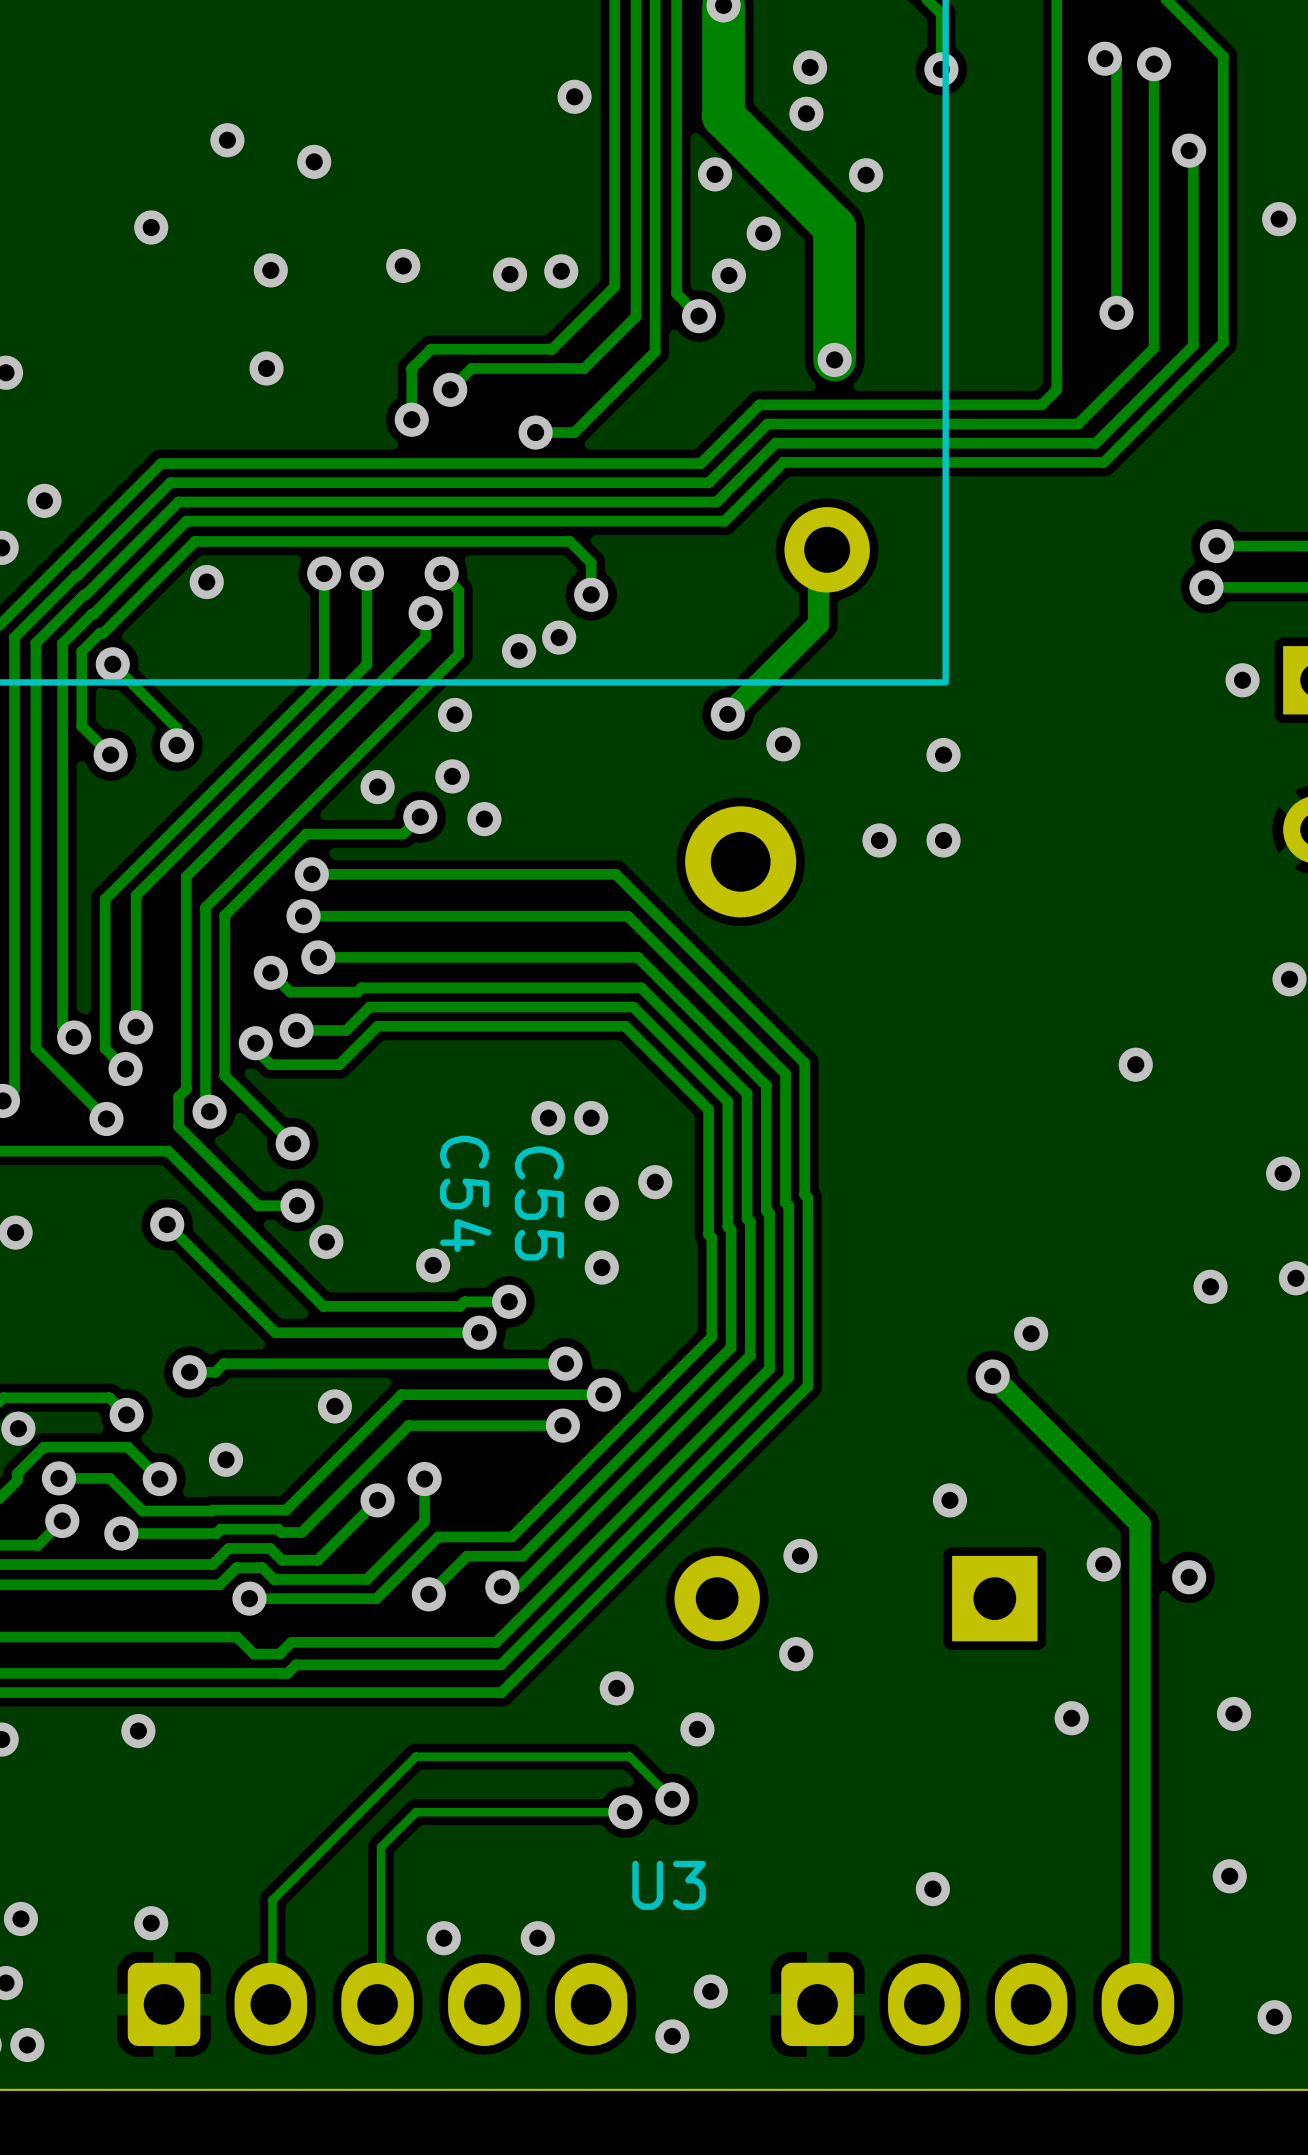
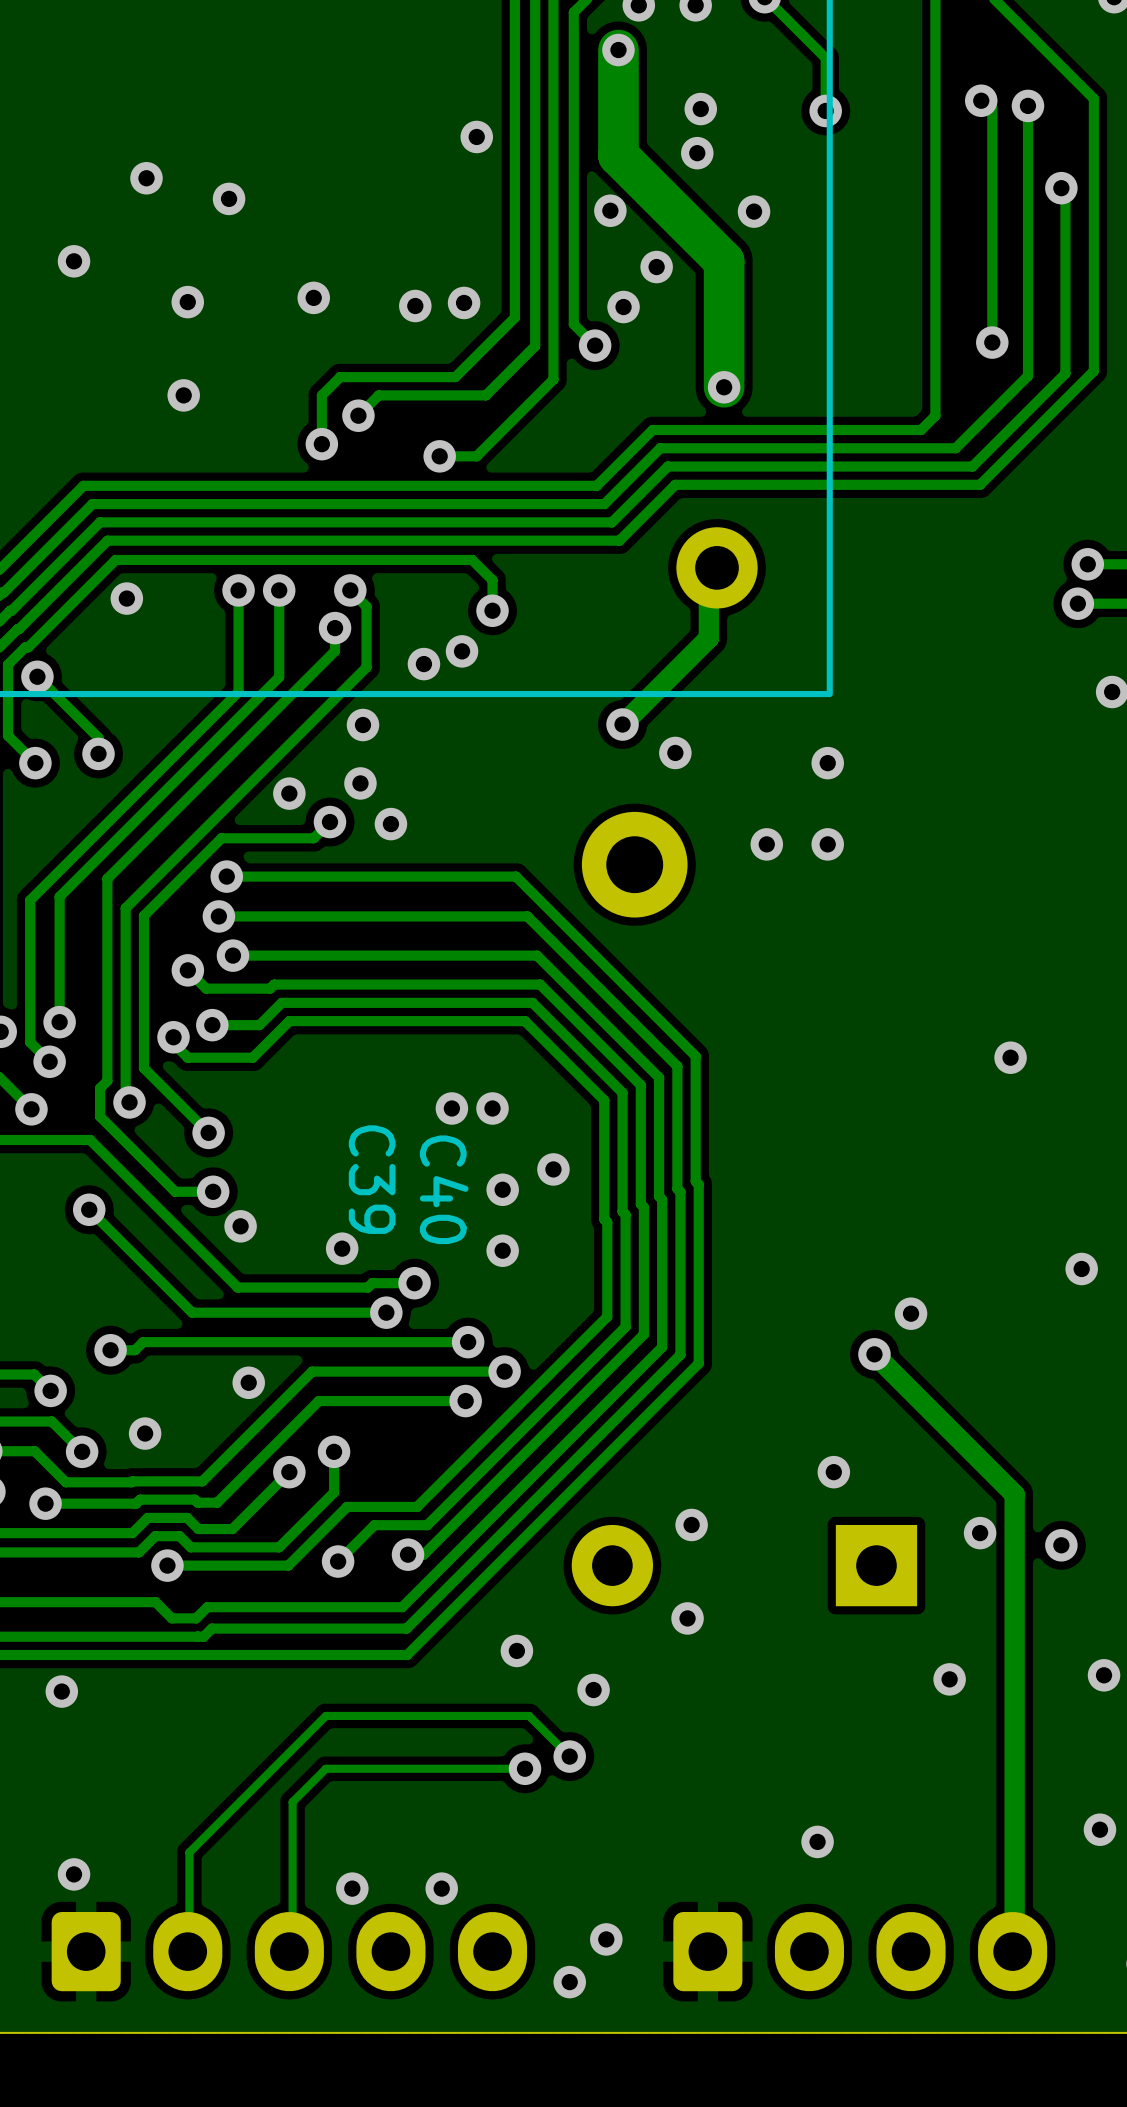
C54 name: C54 (465, 1193) -> C39 (372, 1179)
C55 name: C55 (539, 1203) -> C40 (444, 1189)
U3: (669, 1885) -> none

